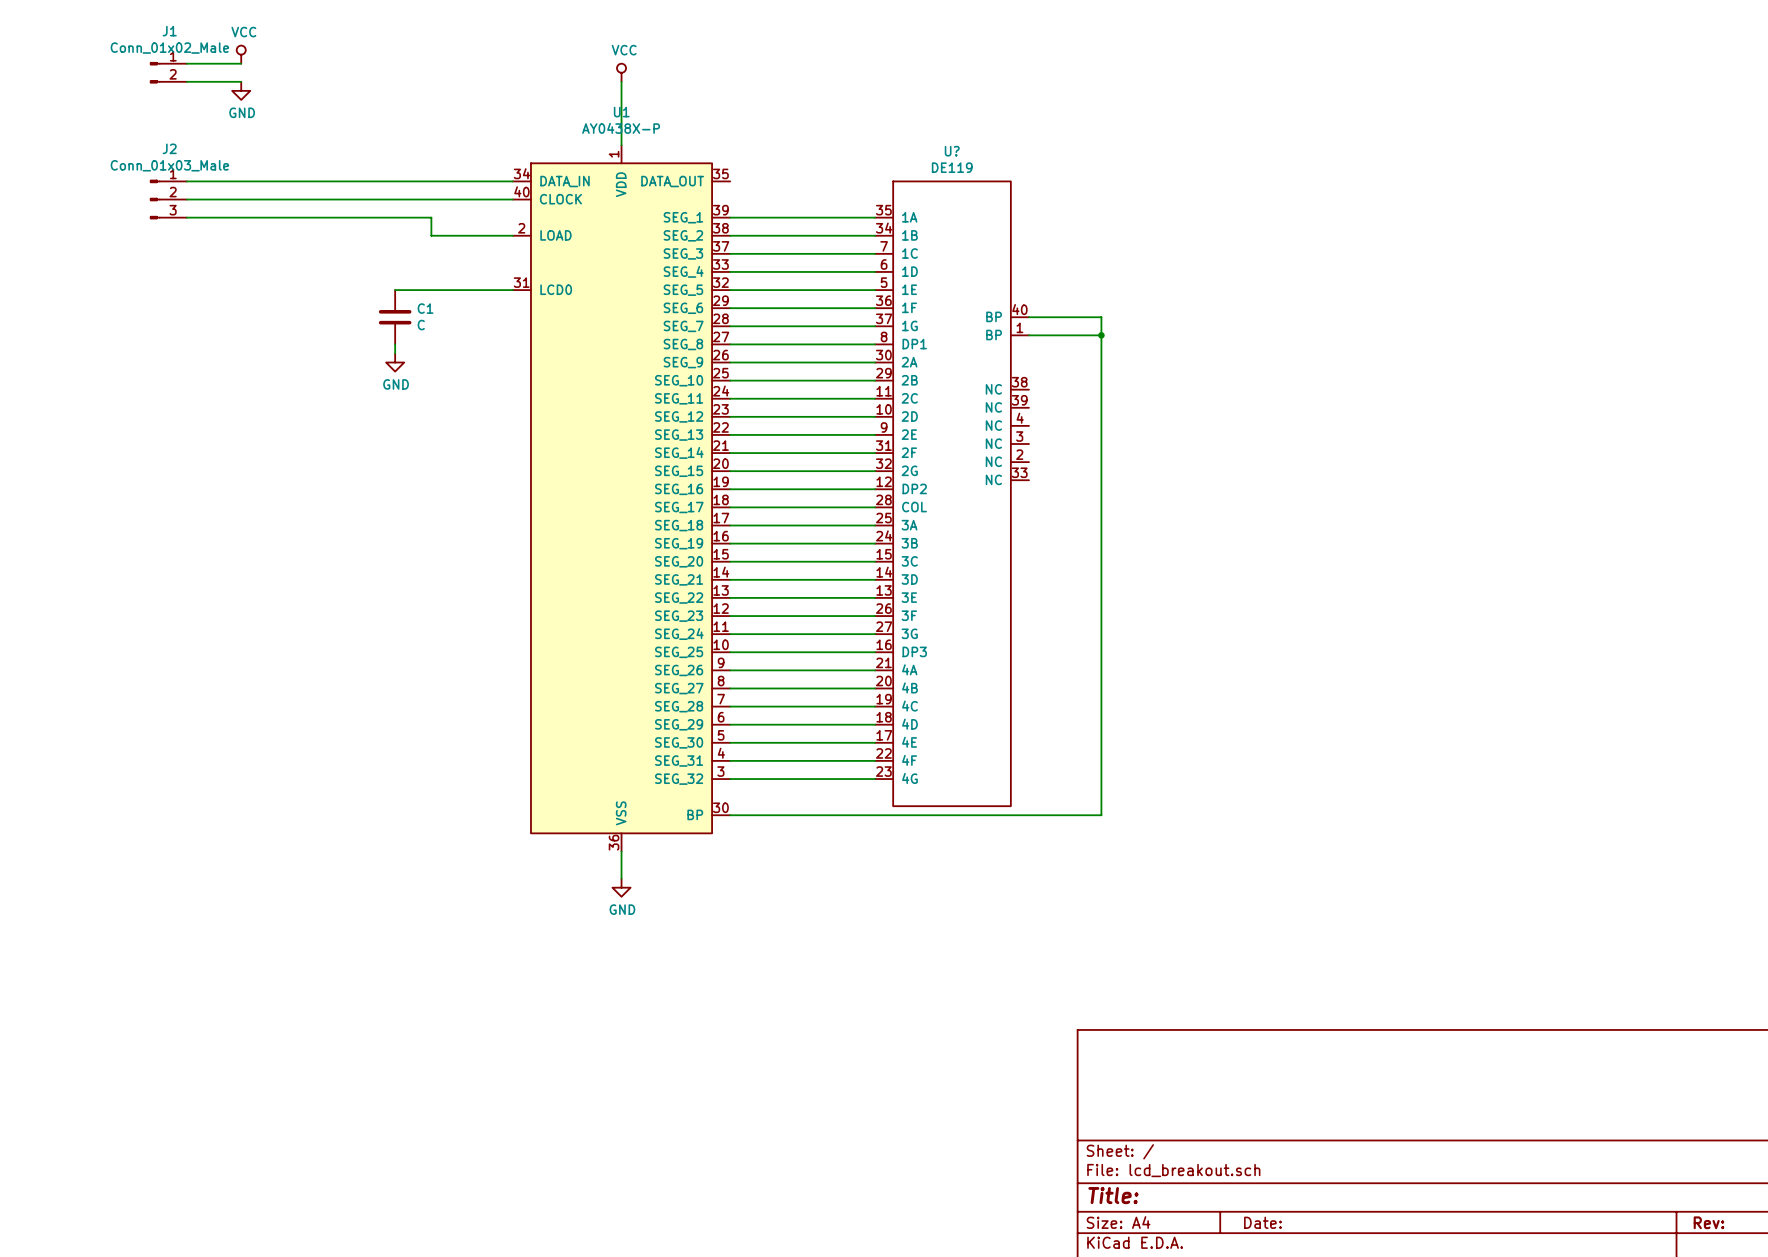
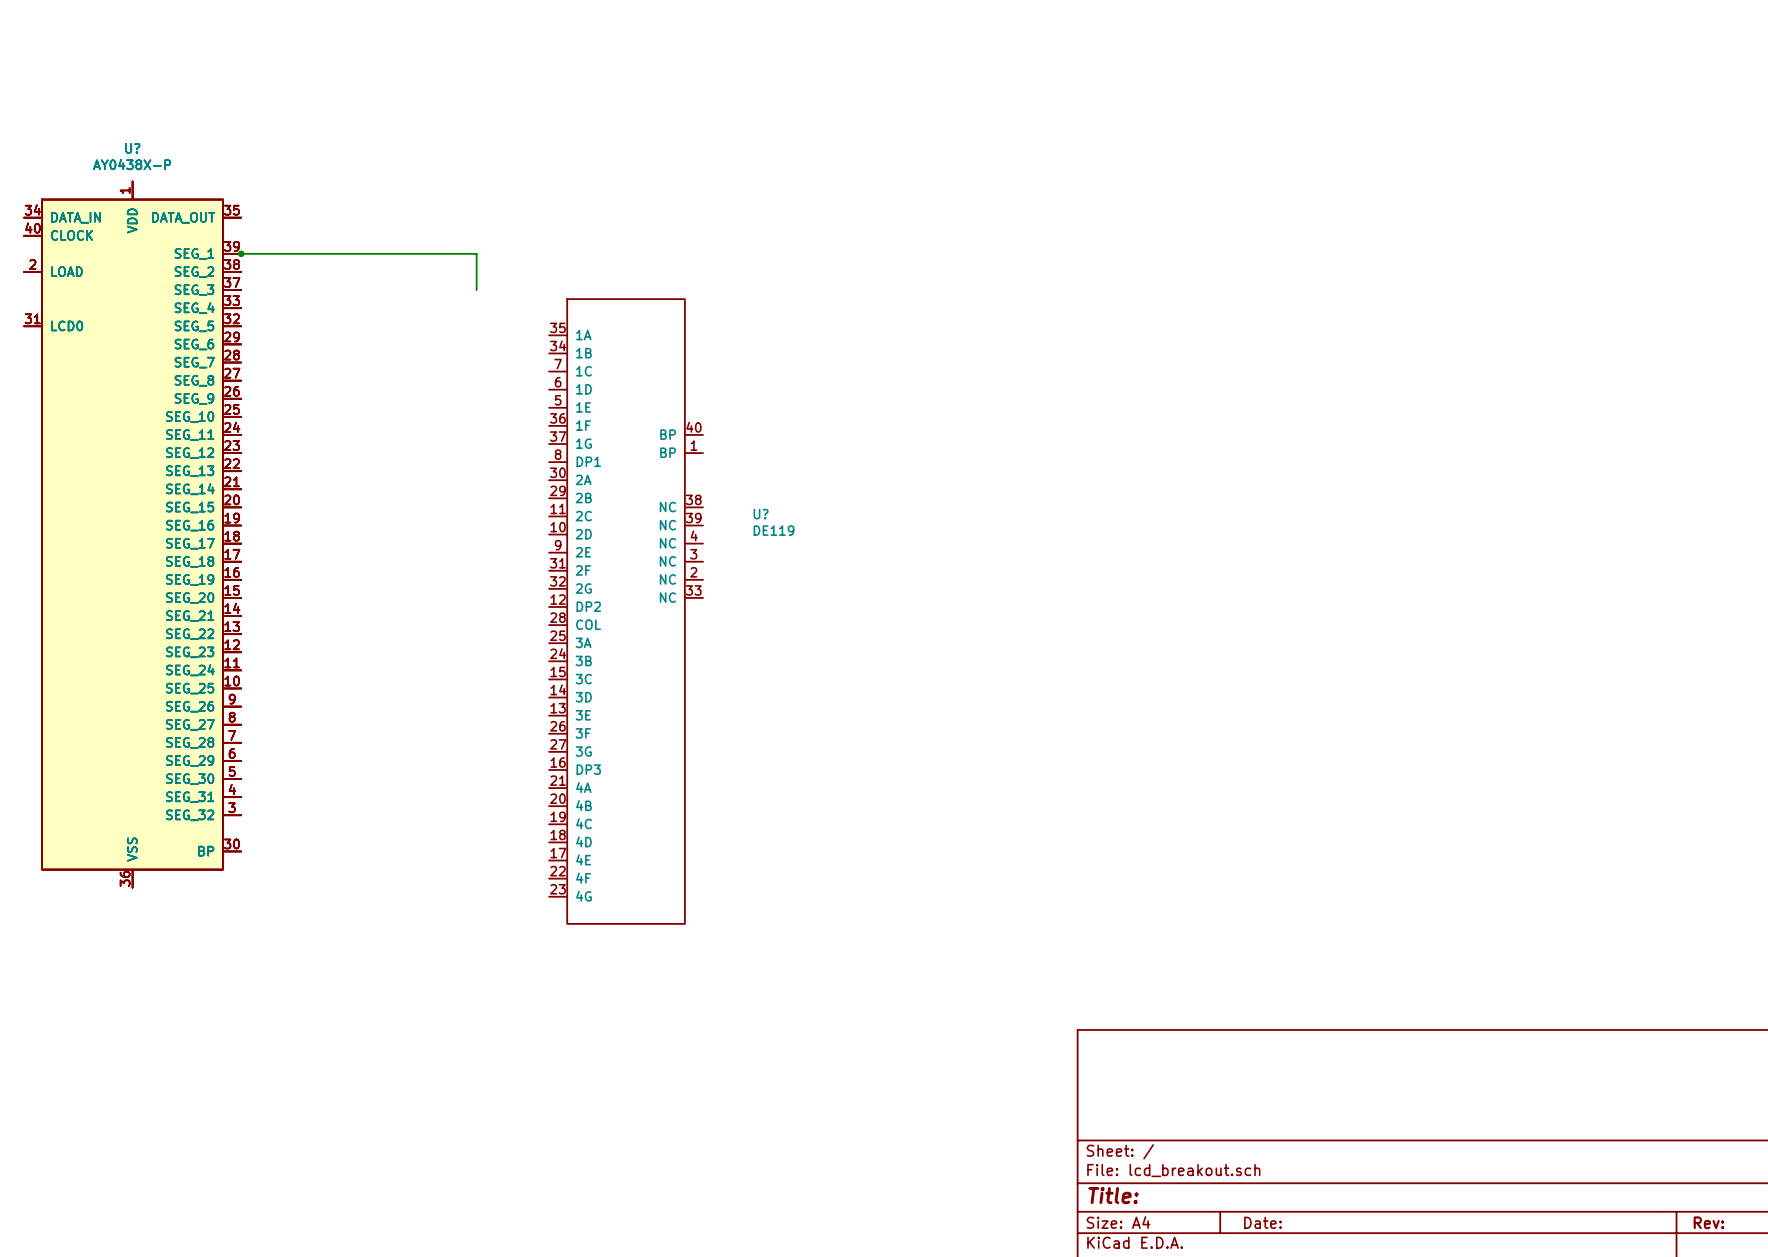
power symbol: VCC (241, 54) -> none
wire: (186, 63) (241, 63) -> none
J1: Conn_01x02_Male (168, 72) -> none
power symbol: VCC (621, 72) -> none
wire: (186, 81) (241, 81) -> none
wire: (621, 81) (621, 145) -> none
power symbol: GND (241, 90) -> none
wire: (186, 181) (512, 181) -> none
J2: Conn_01x03_Male (168, 199) -> none
wire: (186, 199) (512, 199) -> none
wire: (186, 217) (431, 217) (431, 235) (512, 235) -> none
wire: (730, 217) (875, 217) -> none
wire: (730, 235) (875, 235) -> none
wire: none -> (241, 253) (476, 253) (476, 290)
junction: none -> (241, 253)
wire: (730, 253) (875, 253) -> none
wire: (730, 271) (875, 271) -> none
wire: (395, 290) (512, 290) -> none
wire: (730, 290) (875, 290) -> none
wire: (730, 308) (875, 308) -> none
C1: C (395, 317) -> none
wire: (1028, 317) (1101, 317) (1101, 815) (730, 815) -> none
wire: (730, 326) (875, 326) -> none
wire: (1028, 335) (1101, 335) -> none
junction: (1101, 335) -> none
wire: (395, 344) (395, 353) -> none
wire: (730, 344) (875, 344) -> none
power symbol: GND (395, 362) -> none
wire: (730, 362) (875, 362) -> none
wire: (730, 380) (875, 380) -> none
wire: (730, 398) (875, 398) -> none
wire: (730, 416) (875, 416) -> none
wire: (730, 434) (875, 434) -> none
wire: (730, 453) (875, 453) -> none
wire: (730, 471) (875, 471) -> none
wire: (730, 489) (875, 489) -> none
U?: DE119 (952, 493) -> none
U1: AY0438X-P (621, 498) -> none
wire: (730, 507) (875, 507) -> none
wire: (730, 525) (875, 525) -> none
U?: none -> AY0438X-P (132, 534)
wire: (730, 543) (875, 543) -> none
wire: (730, 561) (875, 561) -> none
wire: (730, 579) (875, 579) -> none
wire: (730, 597) (875, 597) -> none
U?: none -> DE119 (626, 611)
wire: (730, 616) (875, 616) -> none
wire: (730, 634) (875, 634) -> none
wire: (730, 652) (875, 652) -> none
wire: (730, 670) (875, 670) -> none
wire: (730, 688) (875, 688) -> none
wire: (730, 706) (875, 706) -> none
wire: (730, 724) (875, 724) -> none
wire: (730, 742) (875, 742) -> none
wire: (730, 760) (875, 760) -> none
wire: (730, 779) (875, 779) -> none
wire: (621, 851) (621, 878) -> none
power symbol: GND (621, 887) -> none

